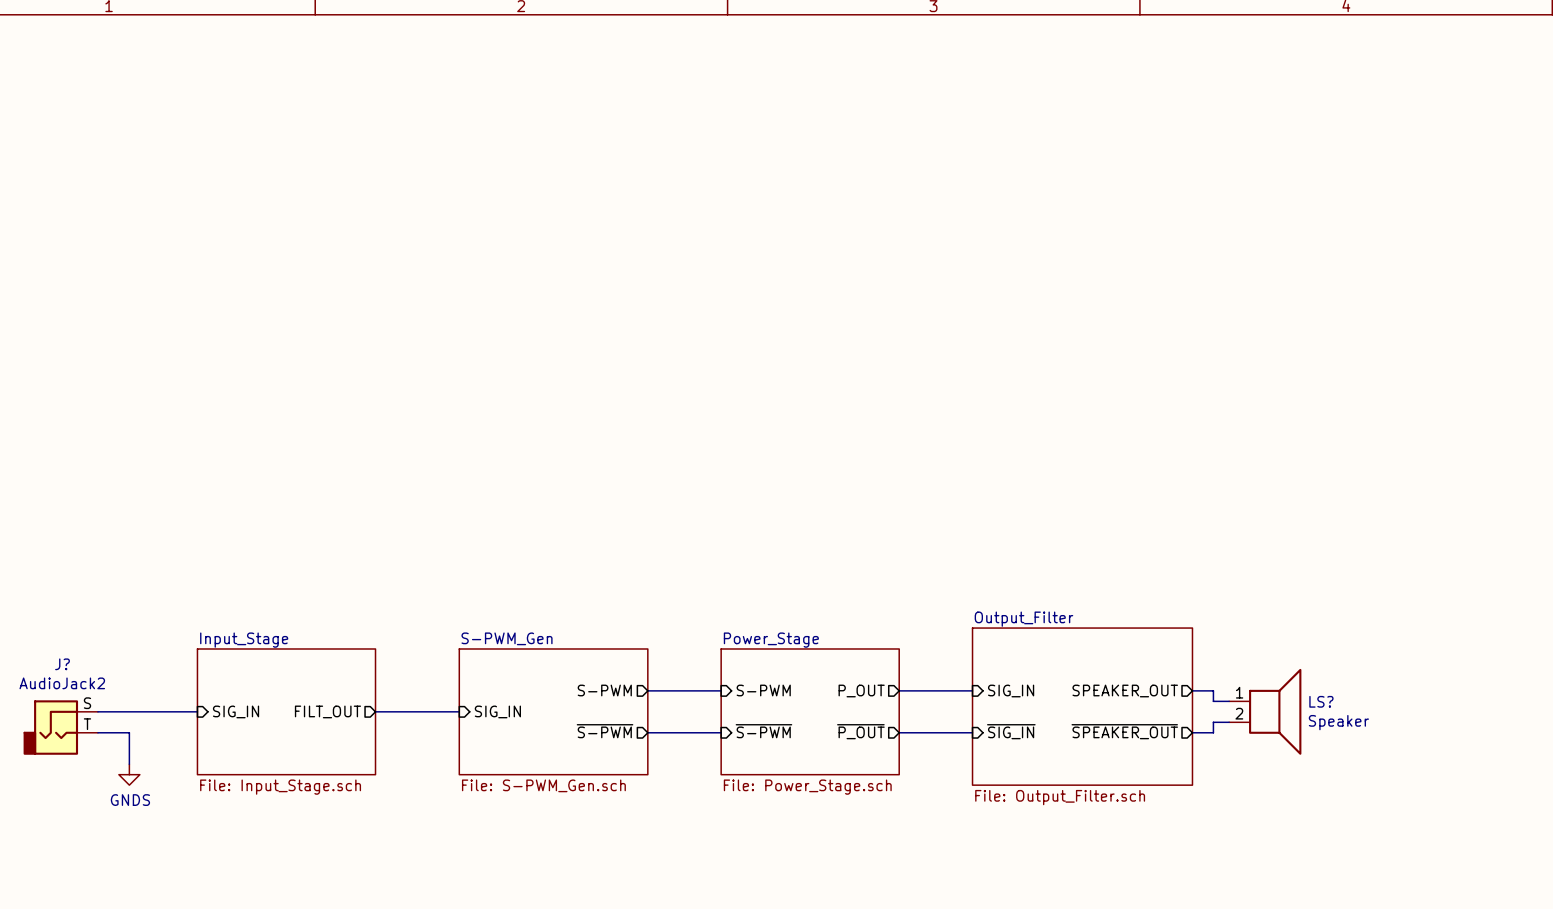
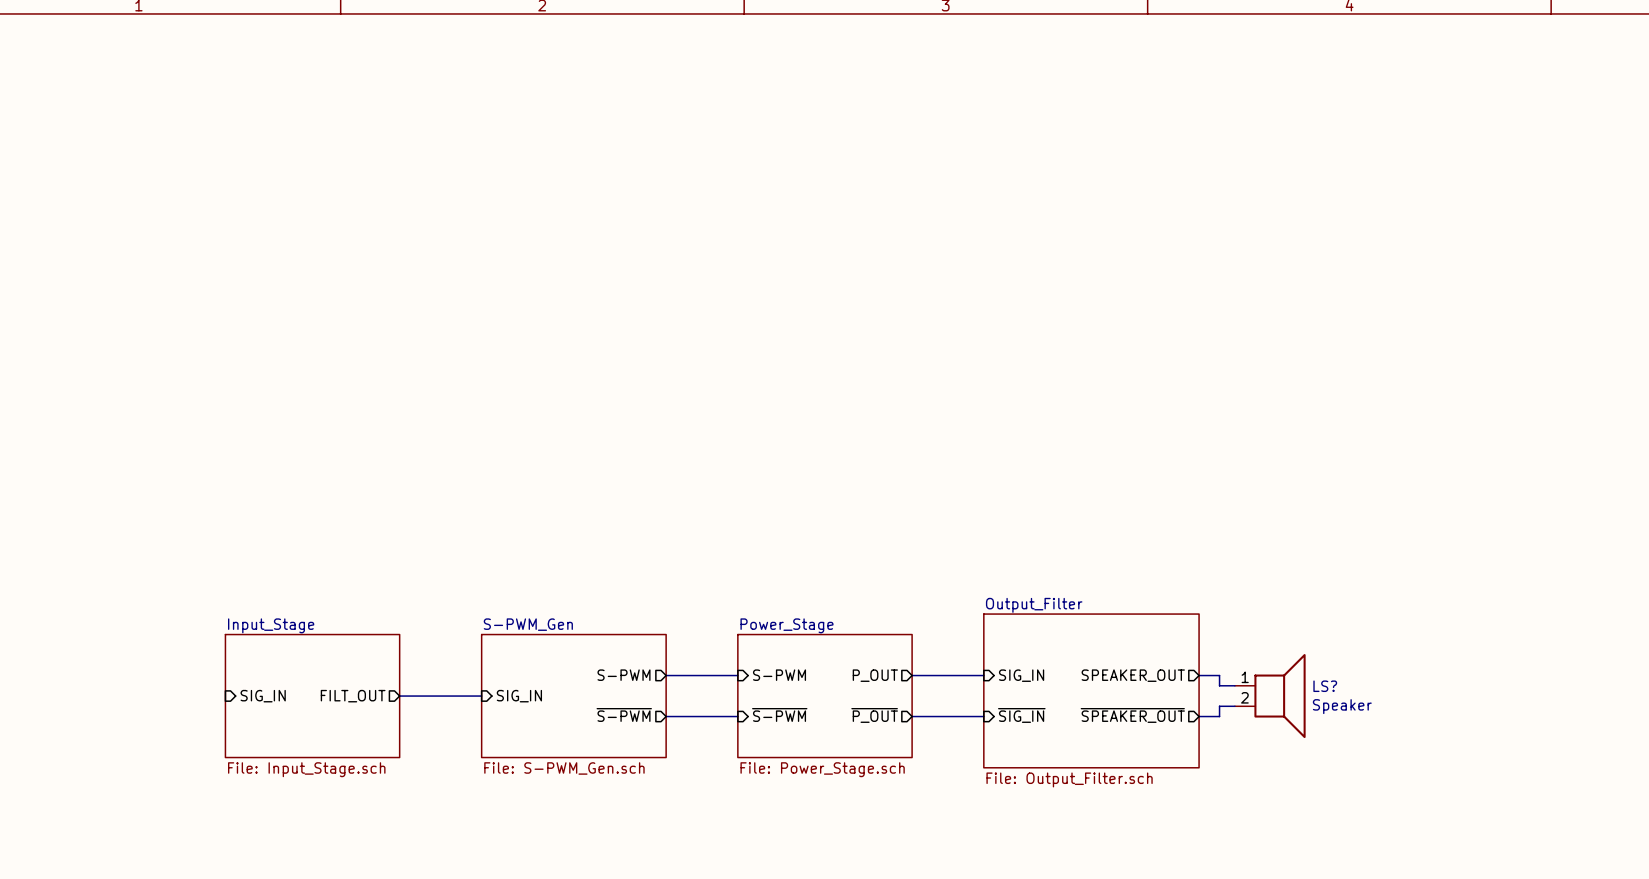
wire: (97, 711) (197, 711) -> none
J?: AudioJack2 (60, 727) -> none
wire: (97, 732) (129, 732) (129, 764) -> none
power symbol: GNDS (129, 774) -> none

